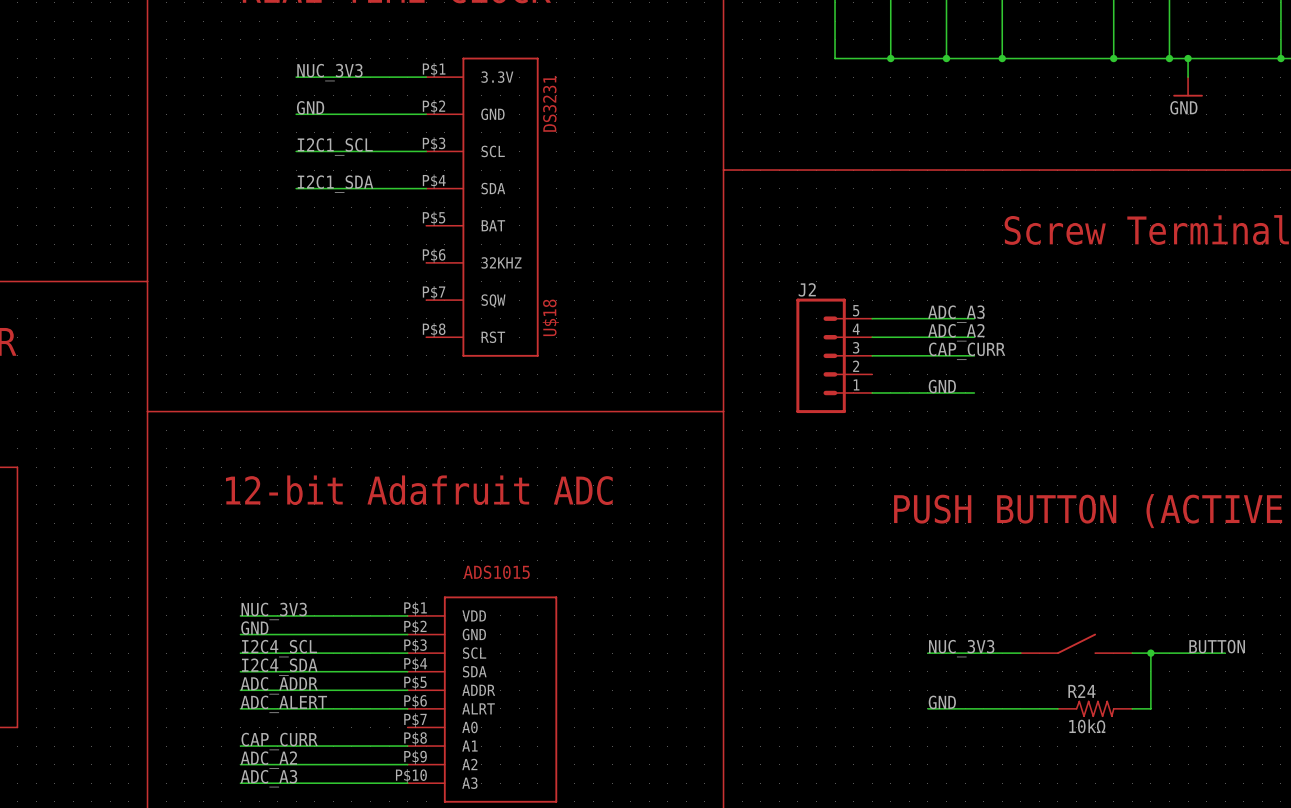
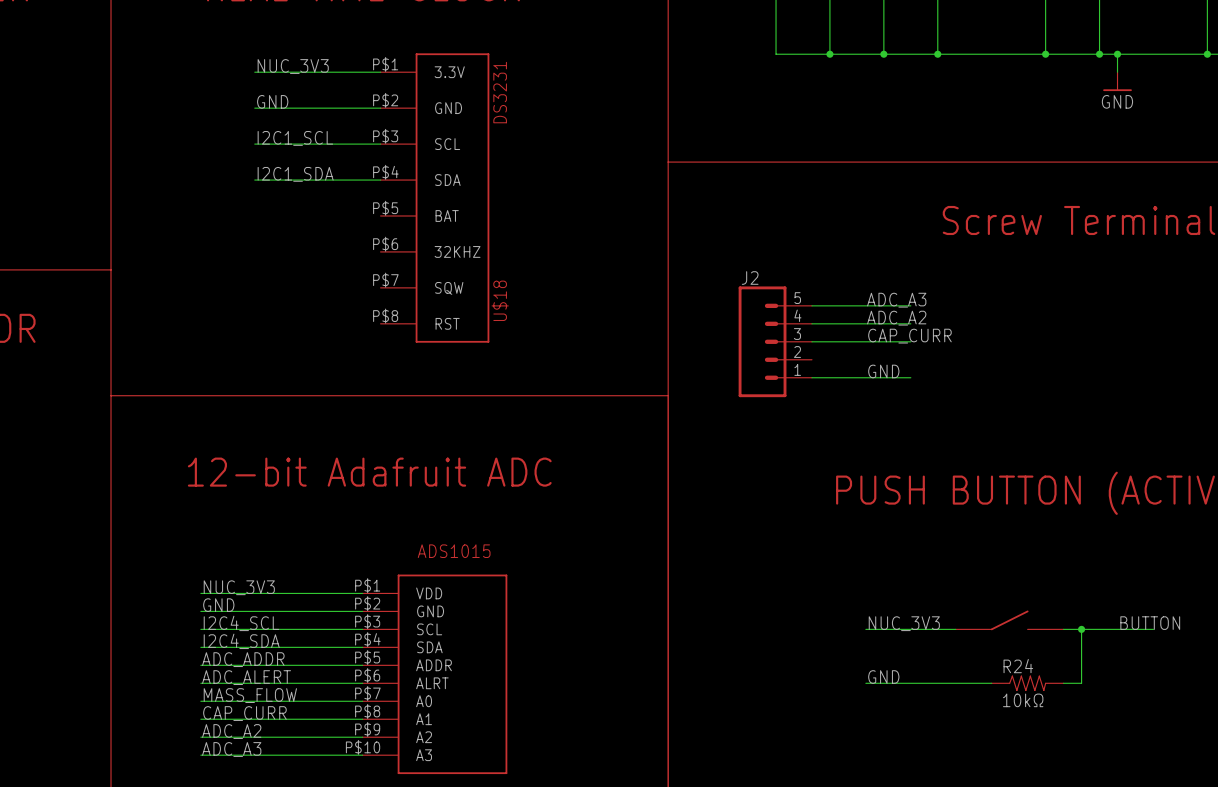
label: none -> MASS_FLOW (250, 695)
wire: none -> (200, 701) (362, 701)

